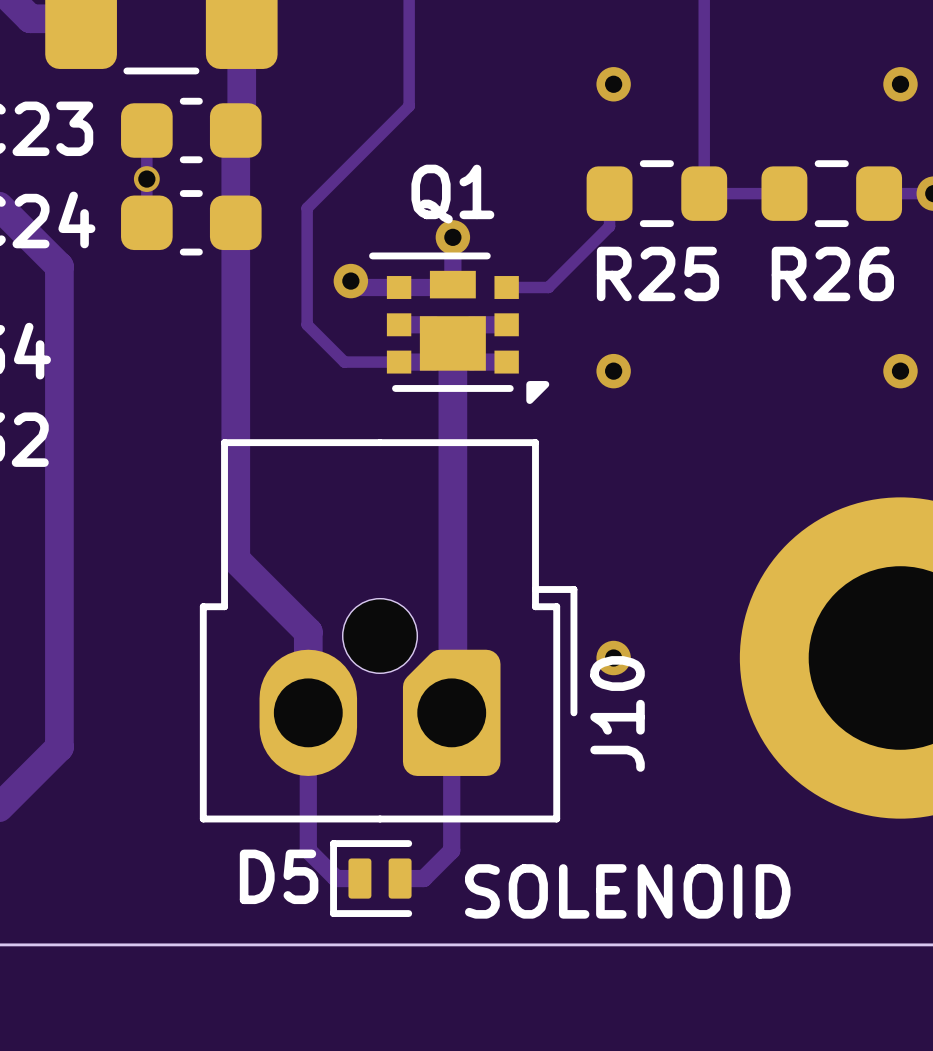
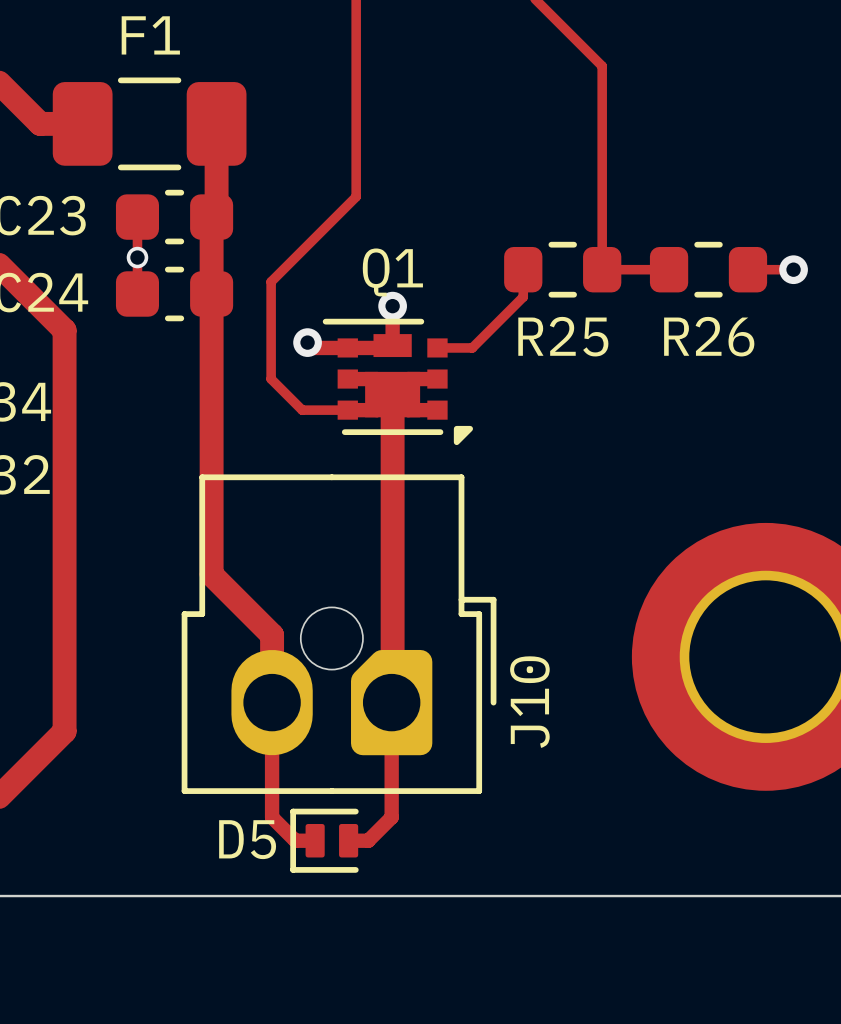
via: (613, 84) -> none
via: (900, 84) -> none
via: (613, 371) -> none
via: (900, 371) -> none
via: (613, 658) -> none
text: SOLENOID (627, 891) -> none

